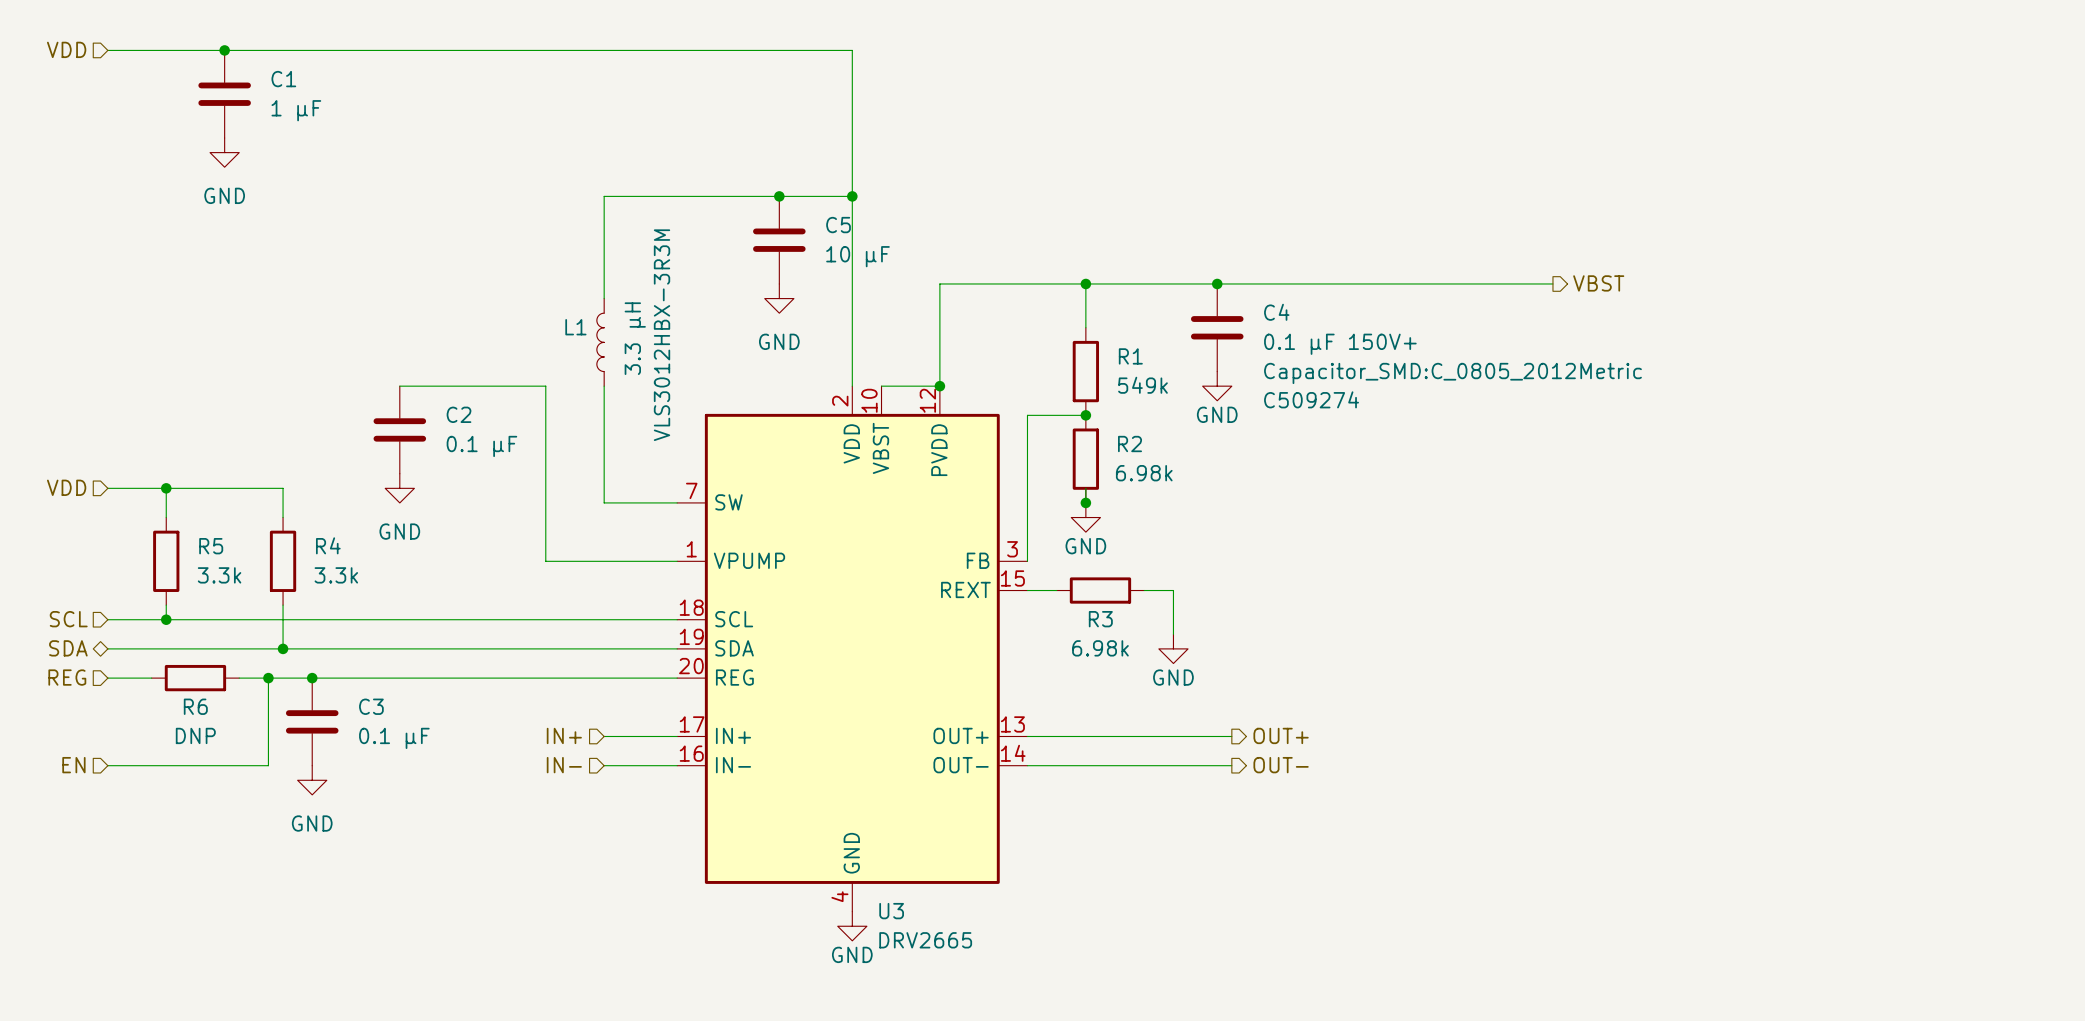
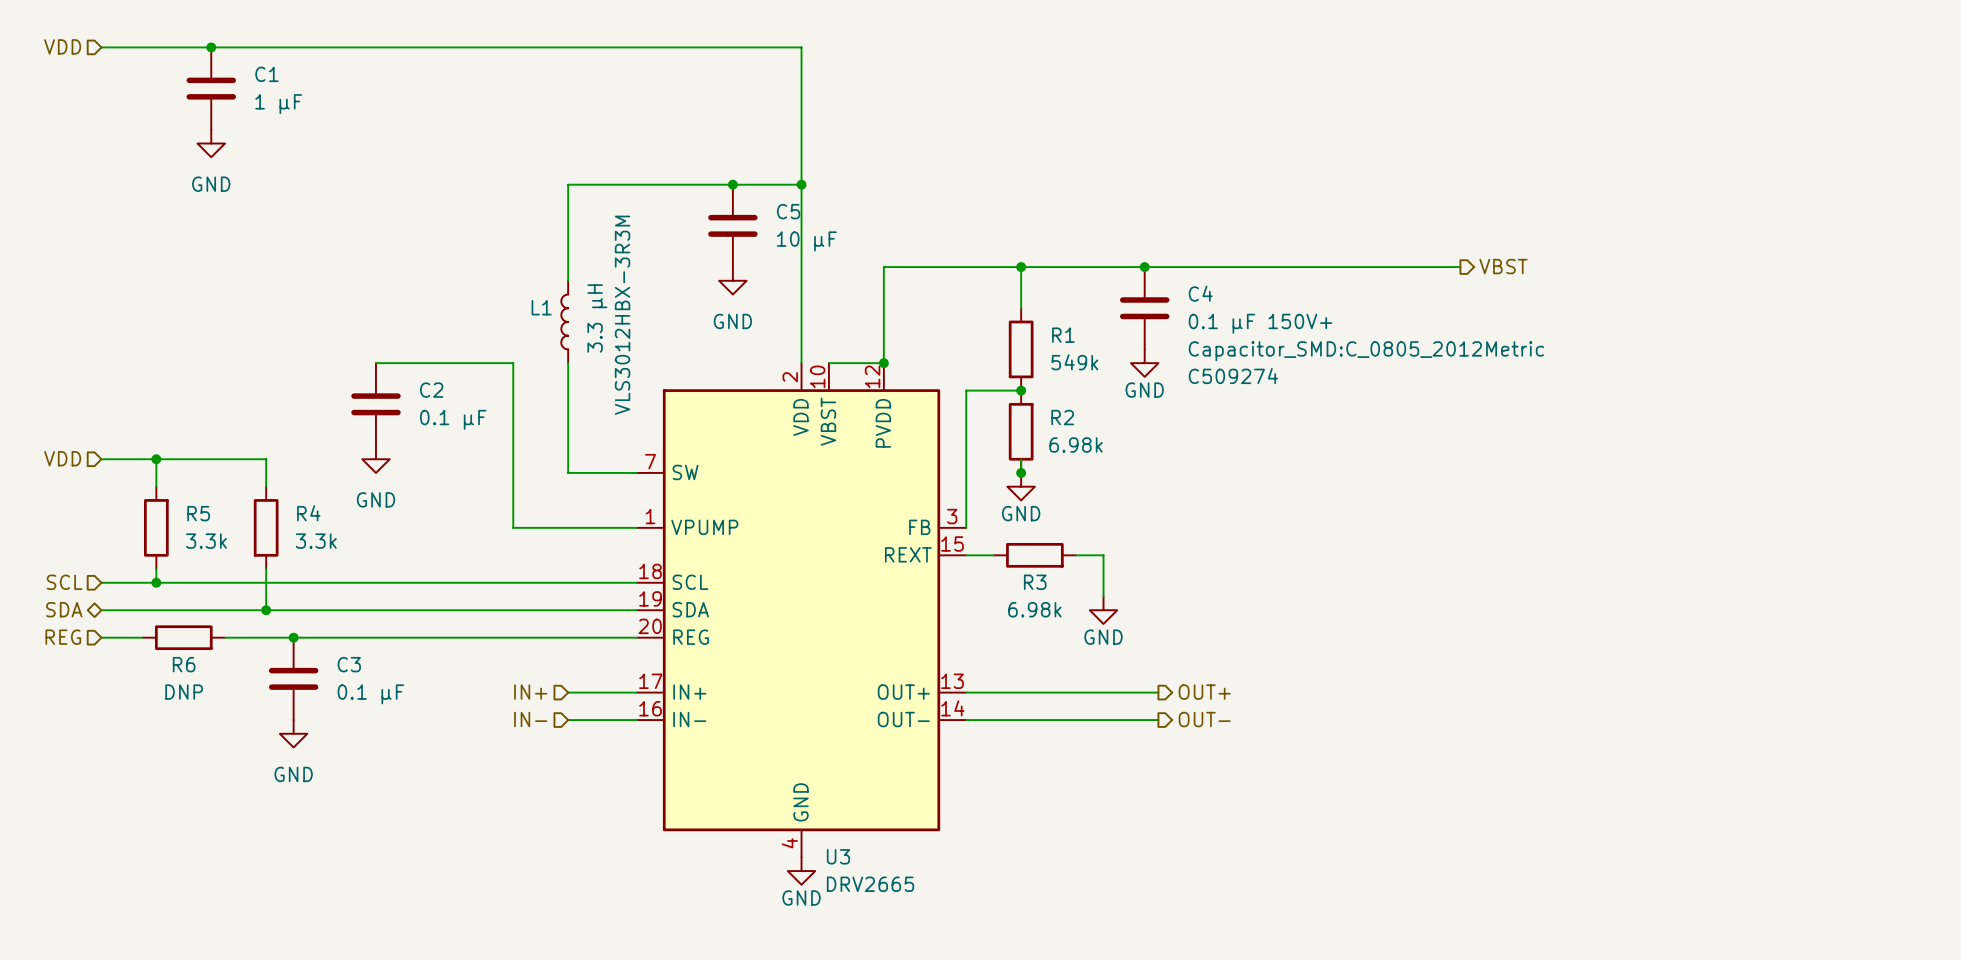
wire: (268, 678) (268, 765) (107, 765) -> none
junction: (268, 678) -> none
hierarchical label: EN (73, 765) -> none

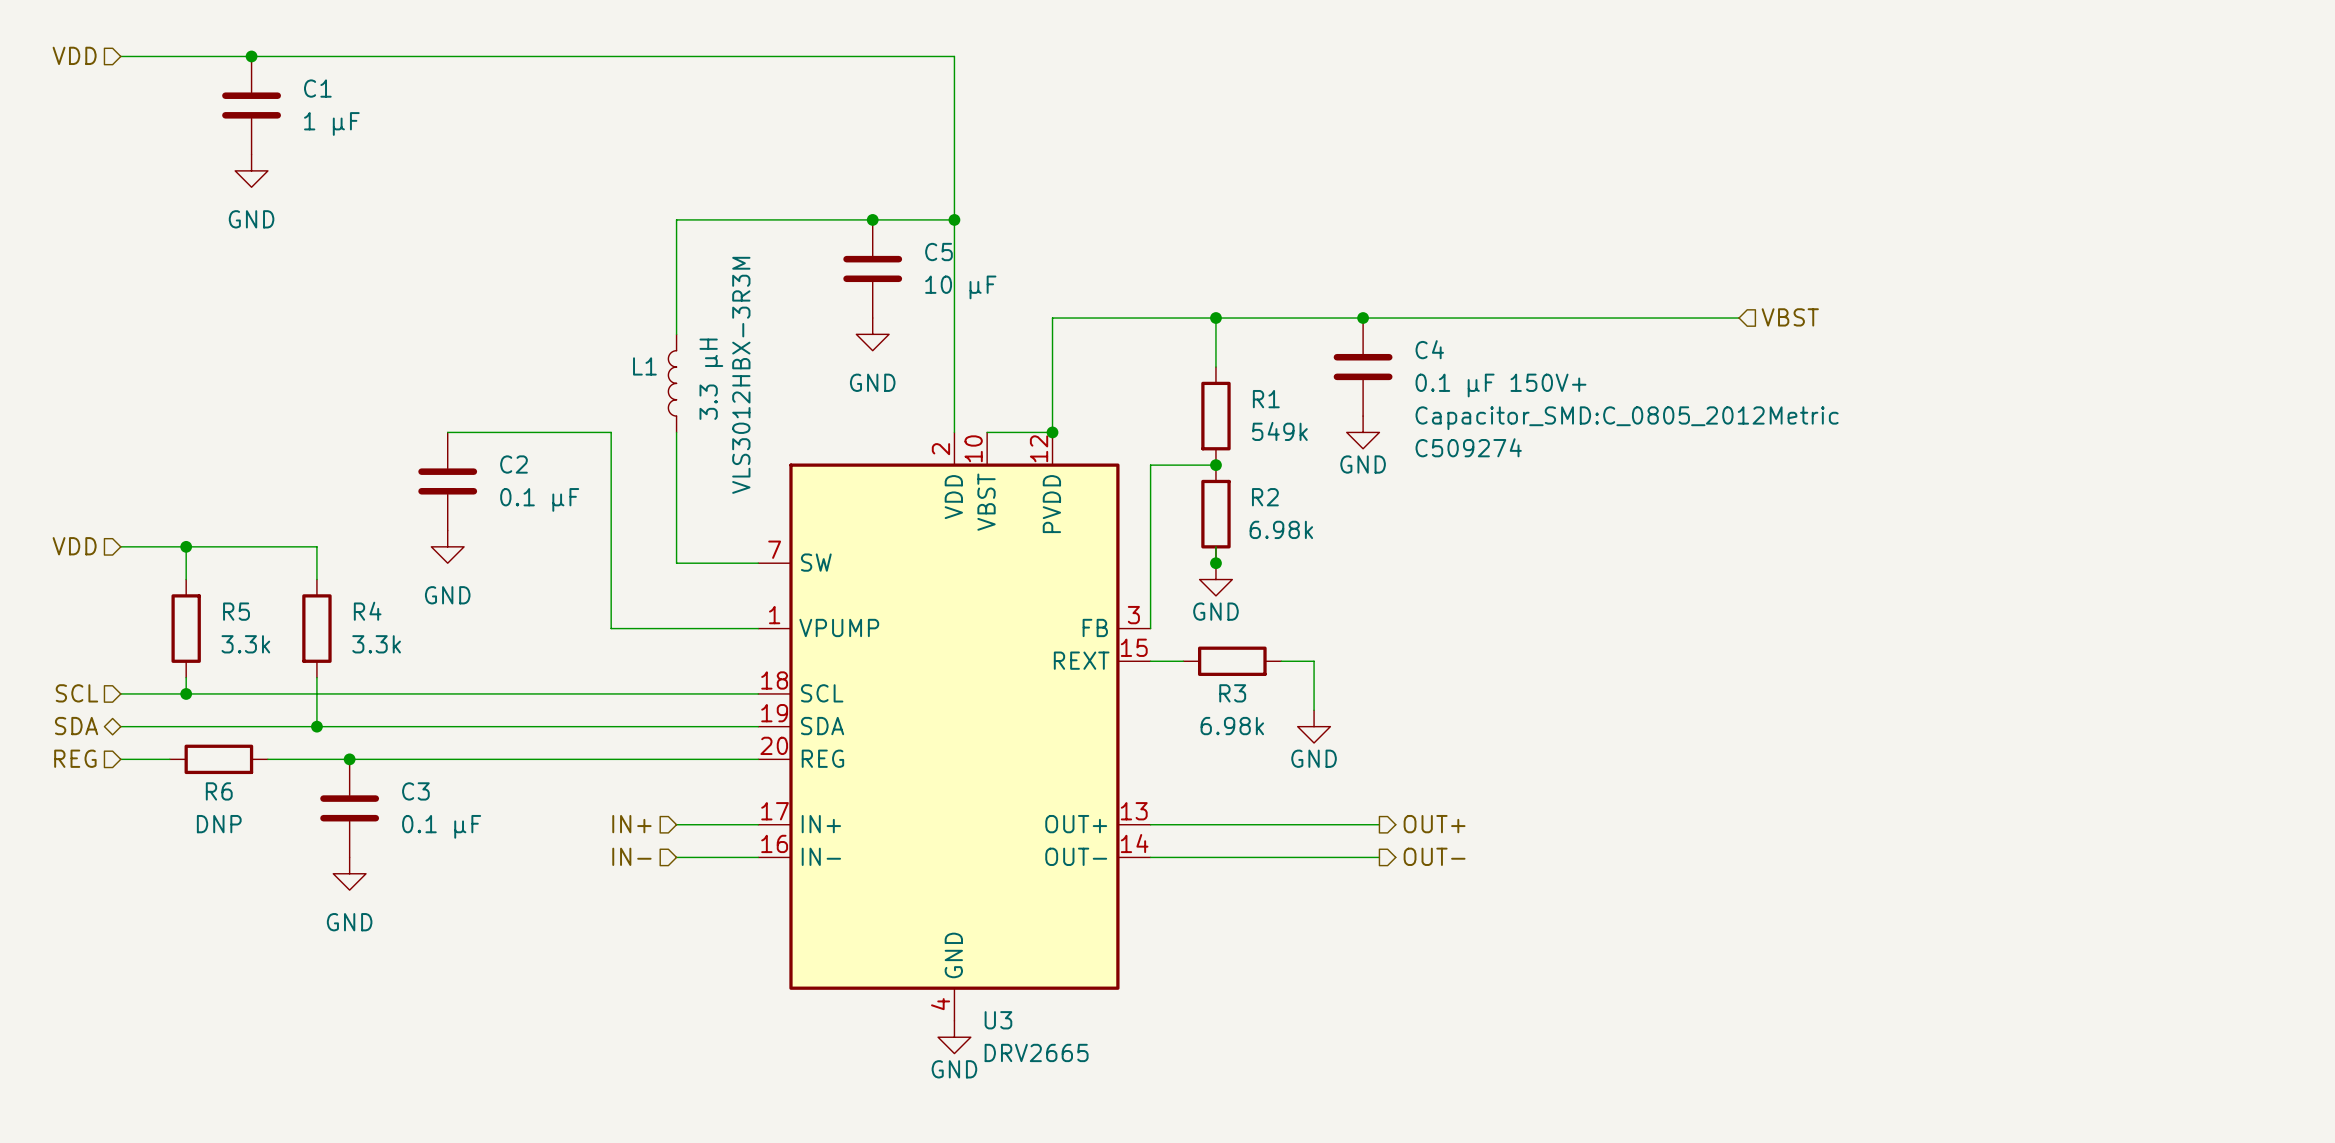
hierarchical label shape: output (1503, 266) -> input (1790, 317)

